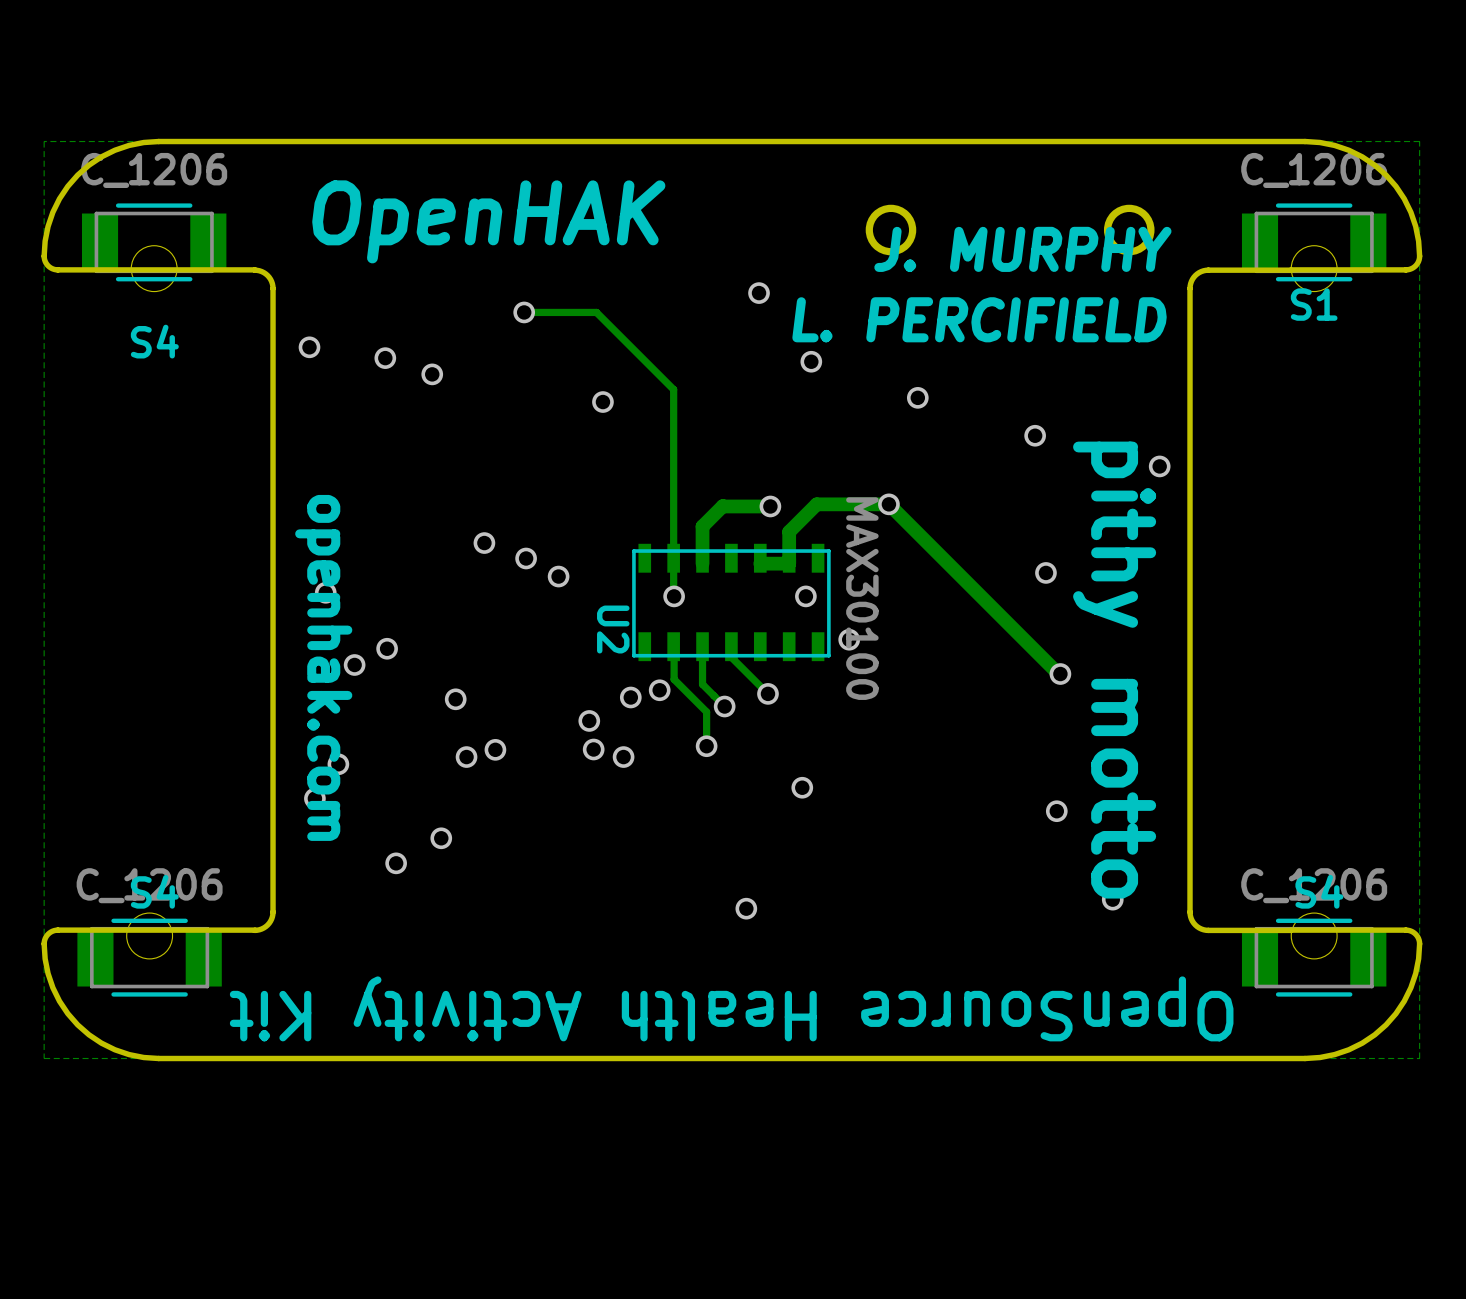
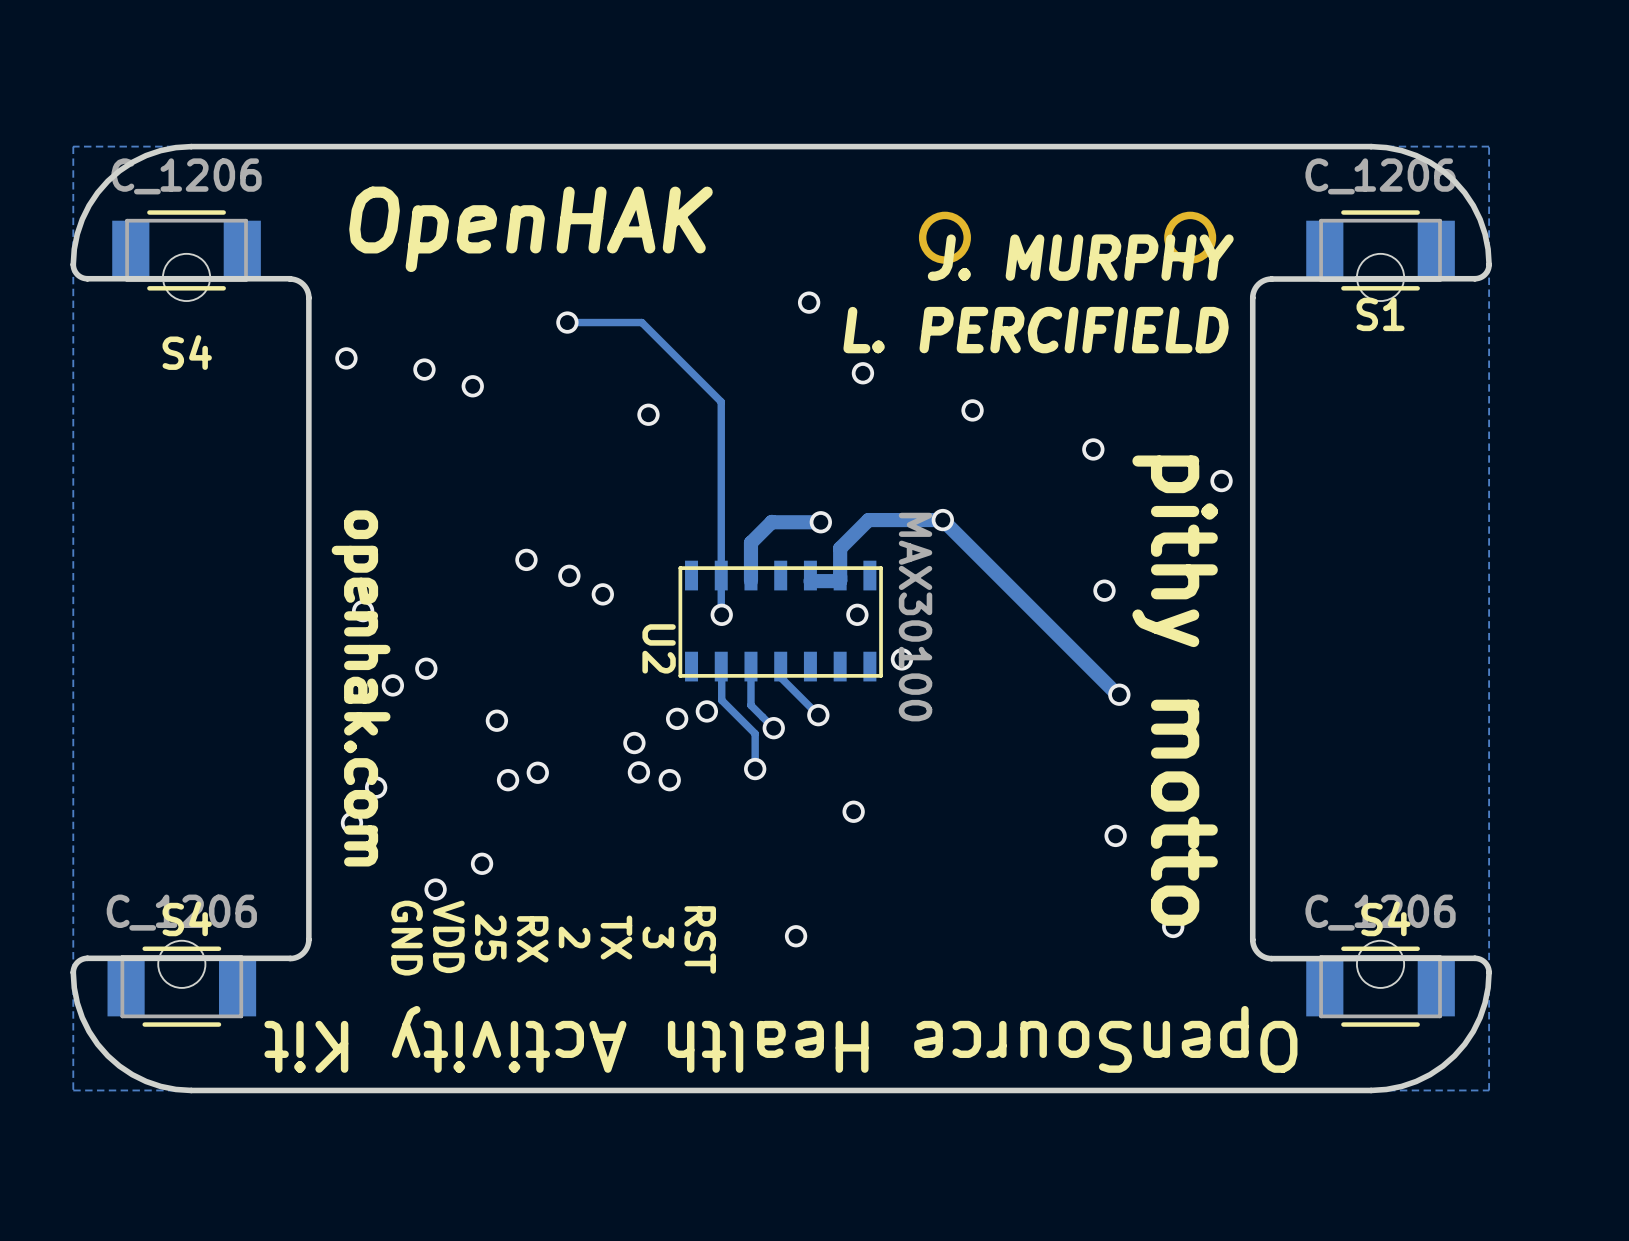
text: none -> VDD (448, 936)
text: none -> 25 (490, 937)
text: none -> 2 (574, 937)
text: none -> TX (616, 937)
text: none -> 3 (658, 937)
text: none -> GND (407, 938)
text: none -> RX (532, 939)
text: none -> RST (700, 939)

